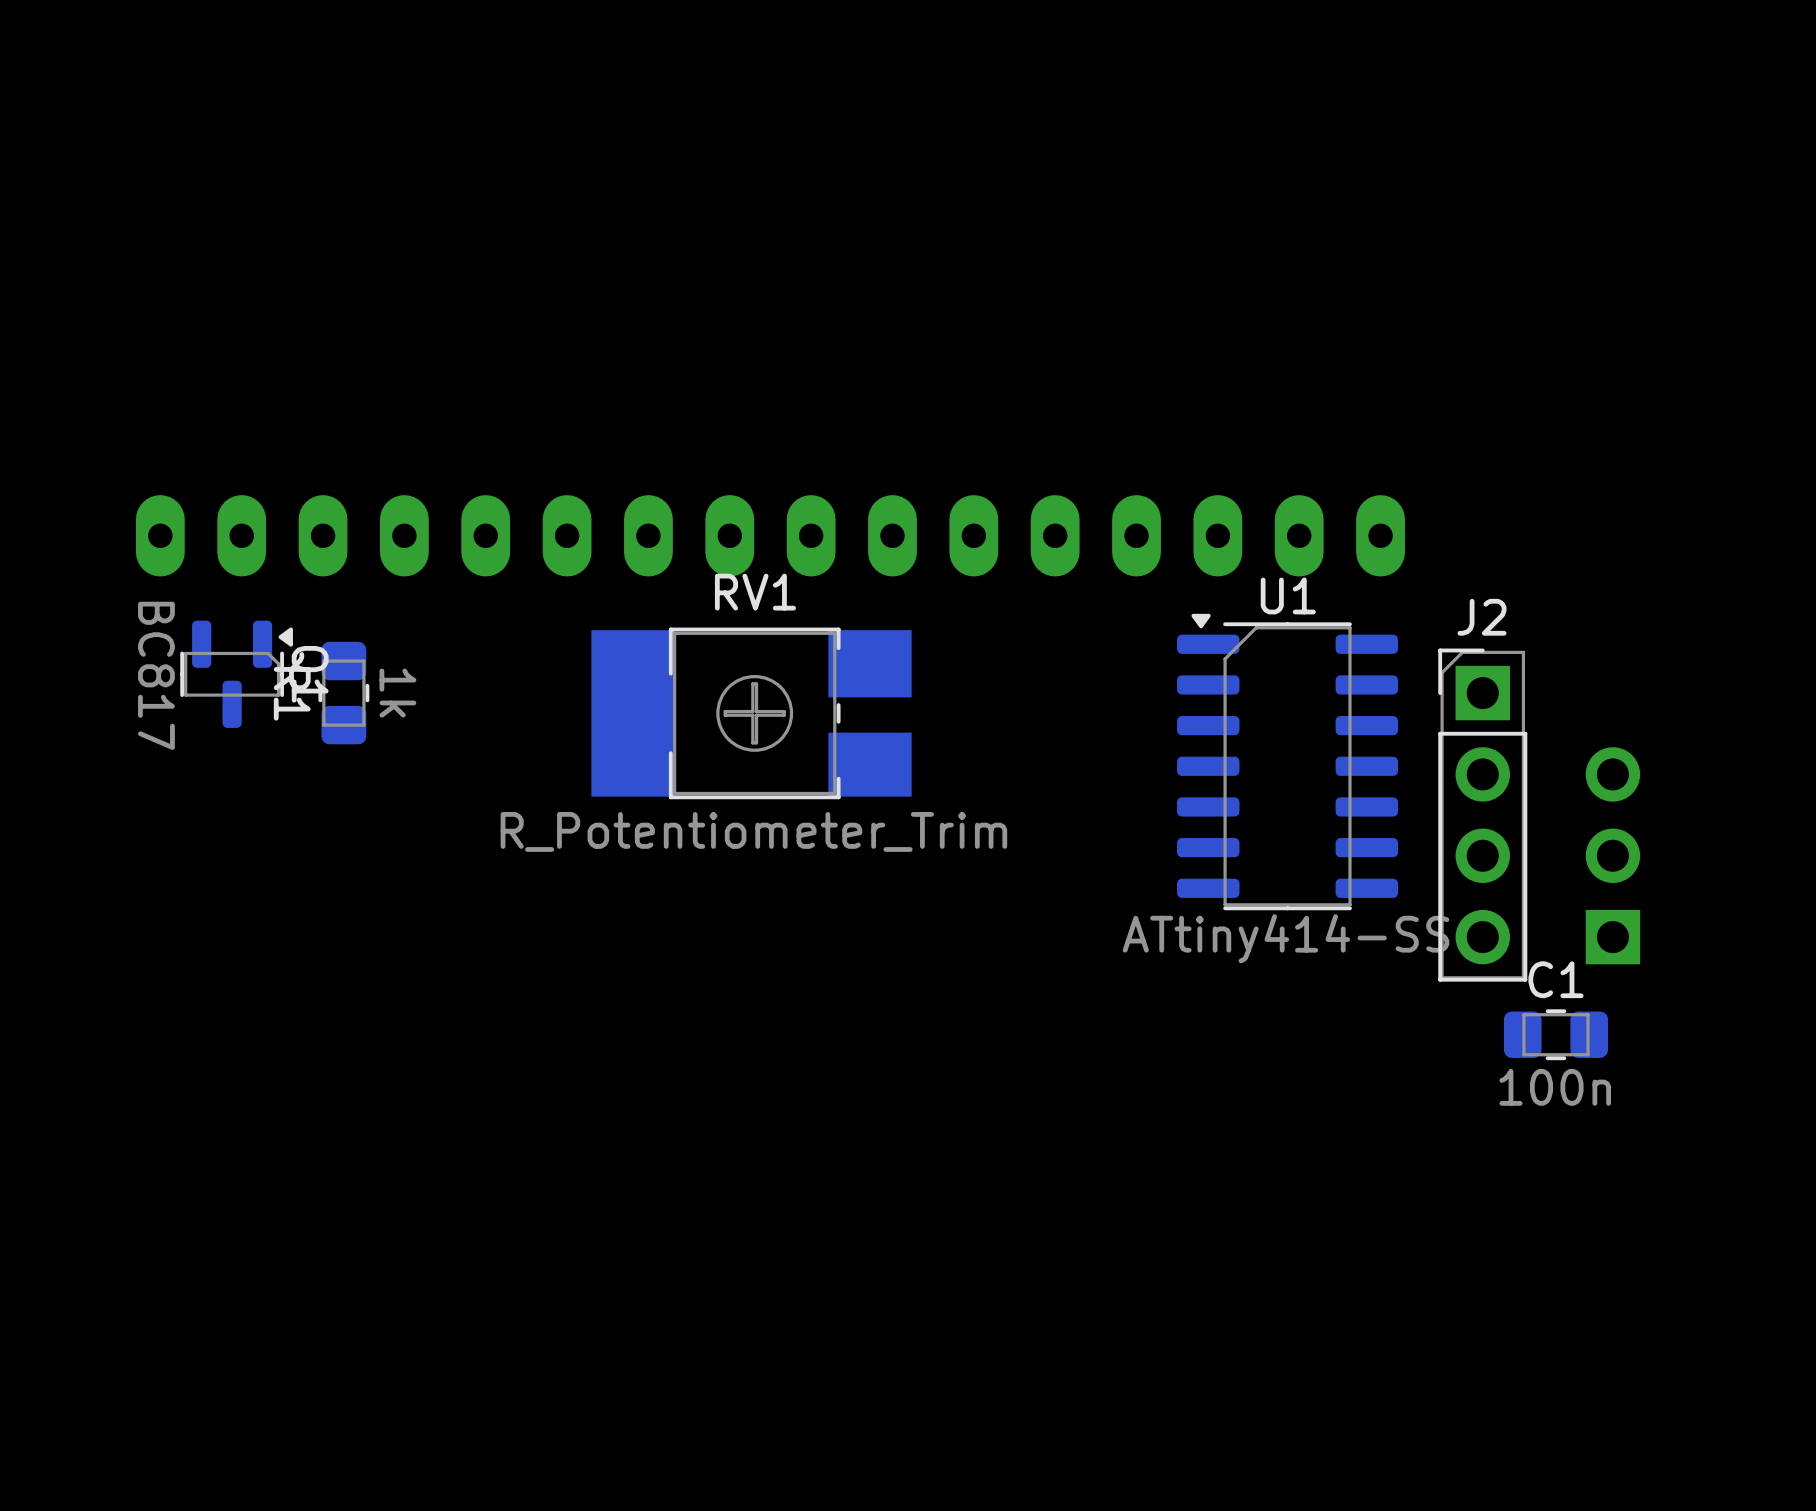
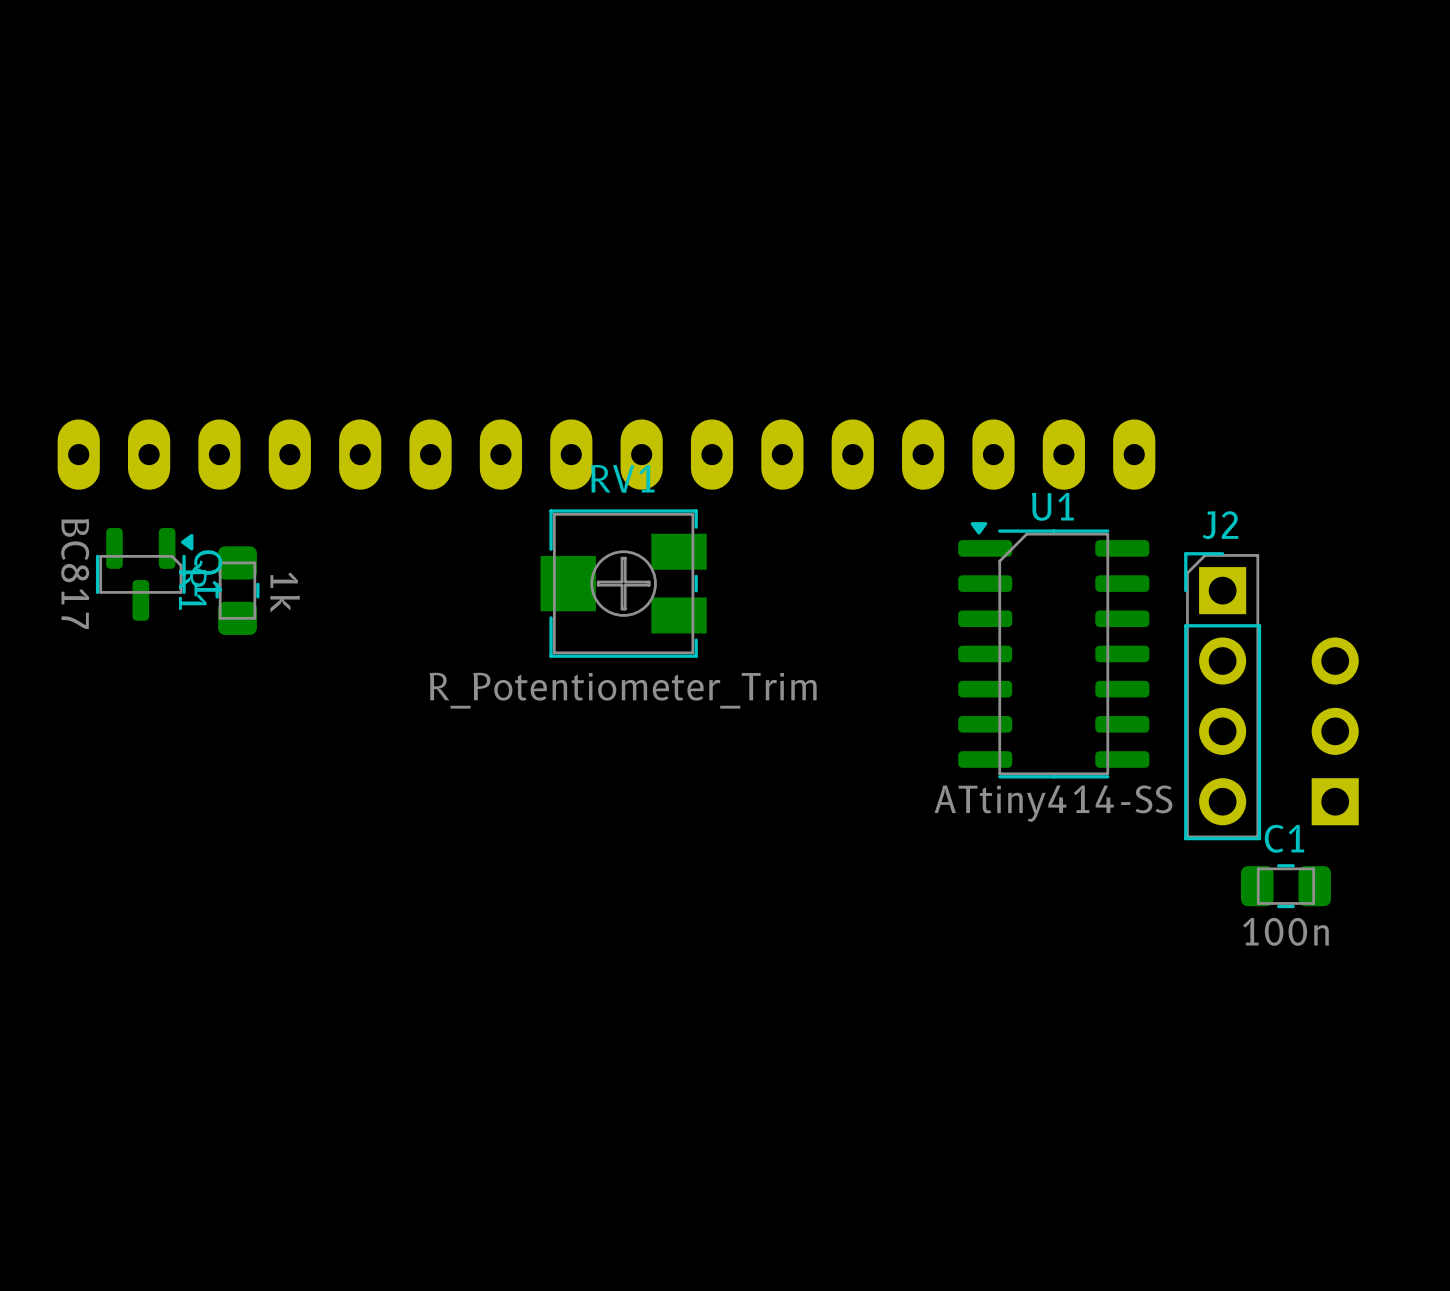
RV1 footprint: [591, 627, 912, 800] -> [540, 509, 707, 658]

